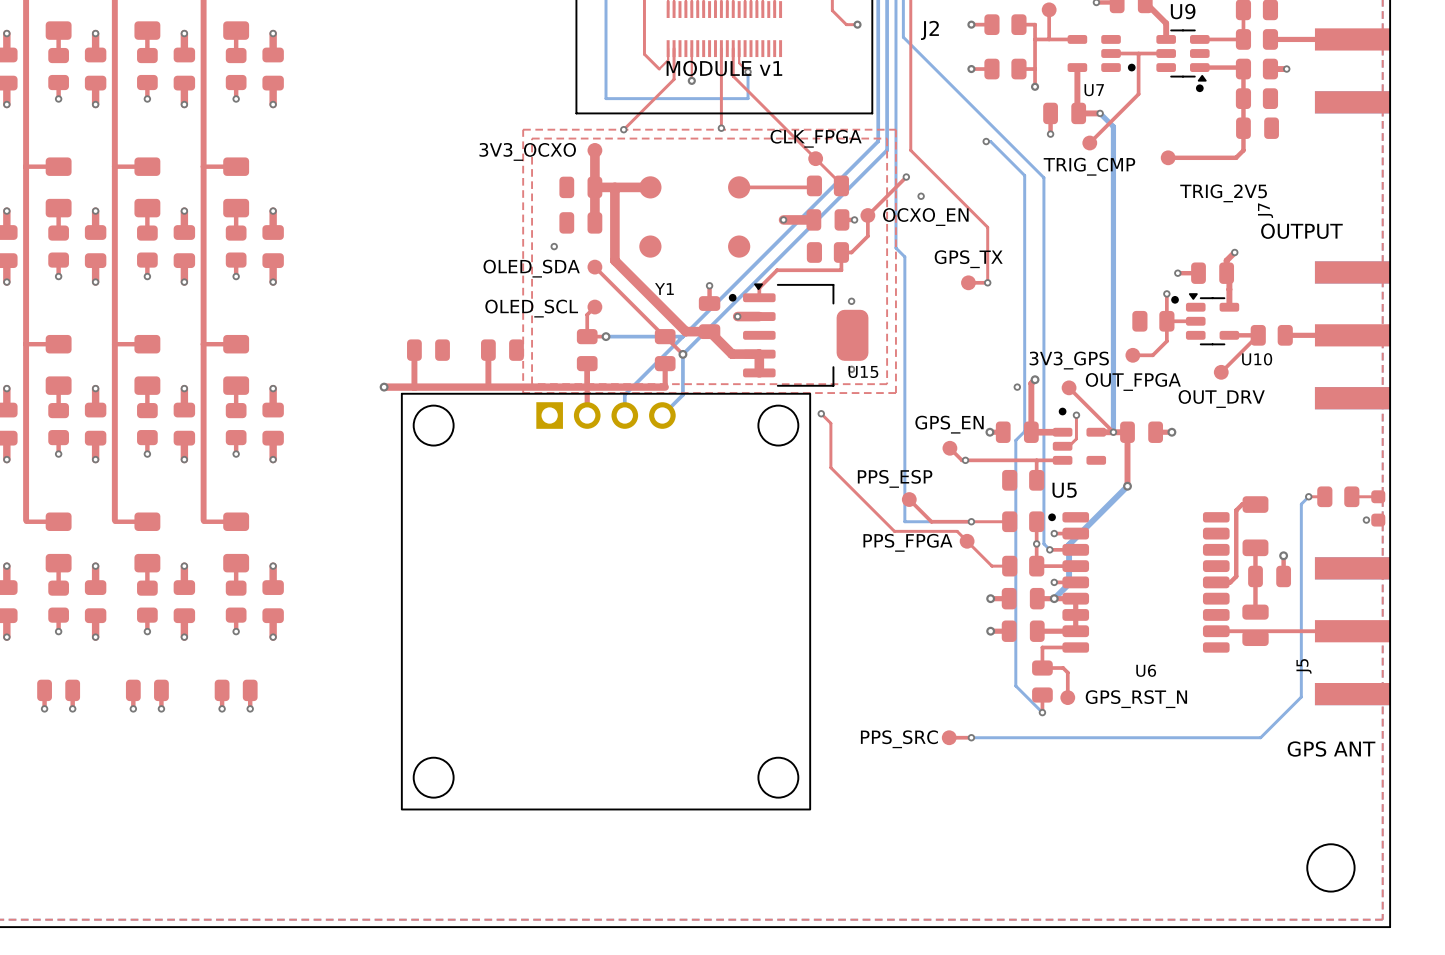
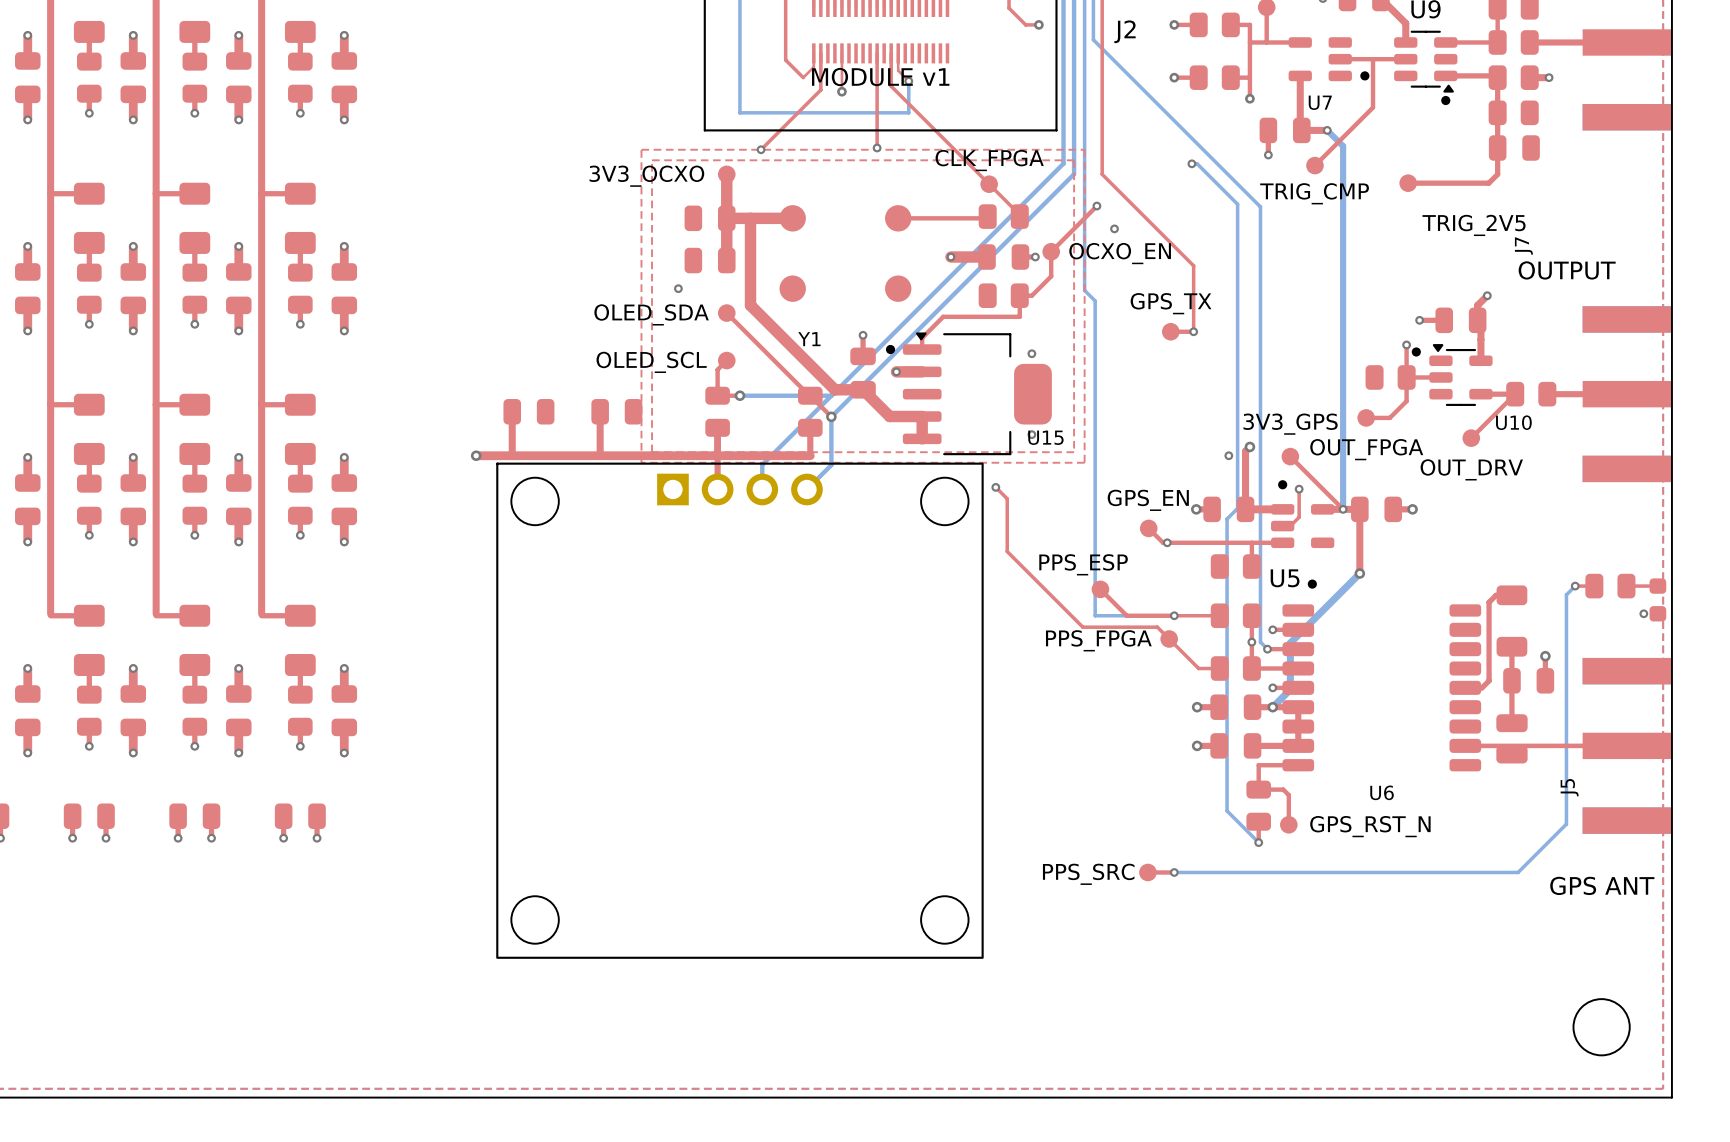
drawing position: (1052, 517) -> (1312, 584)

